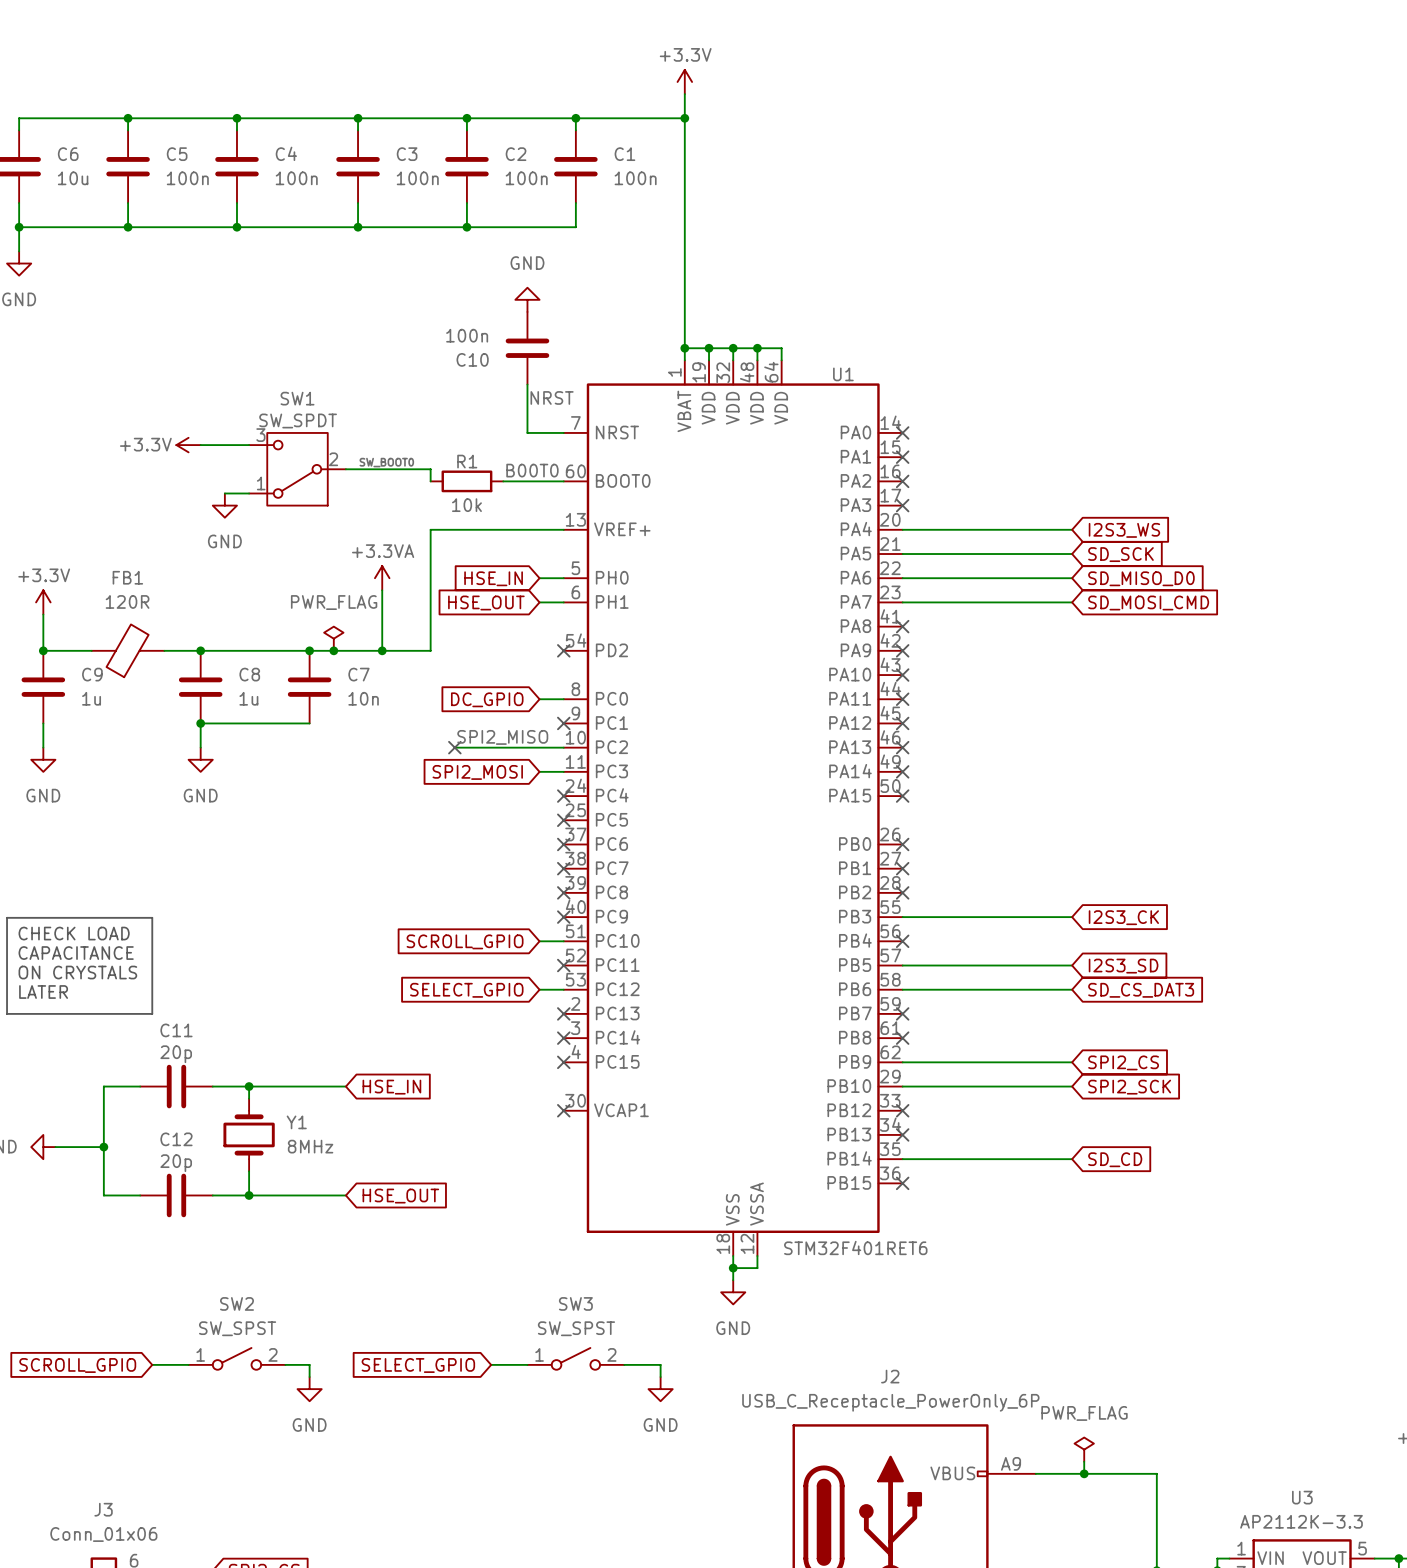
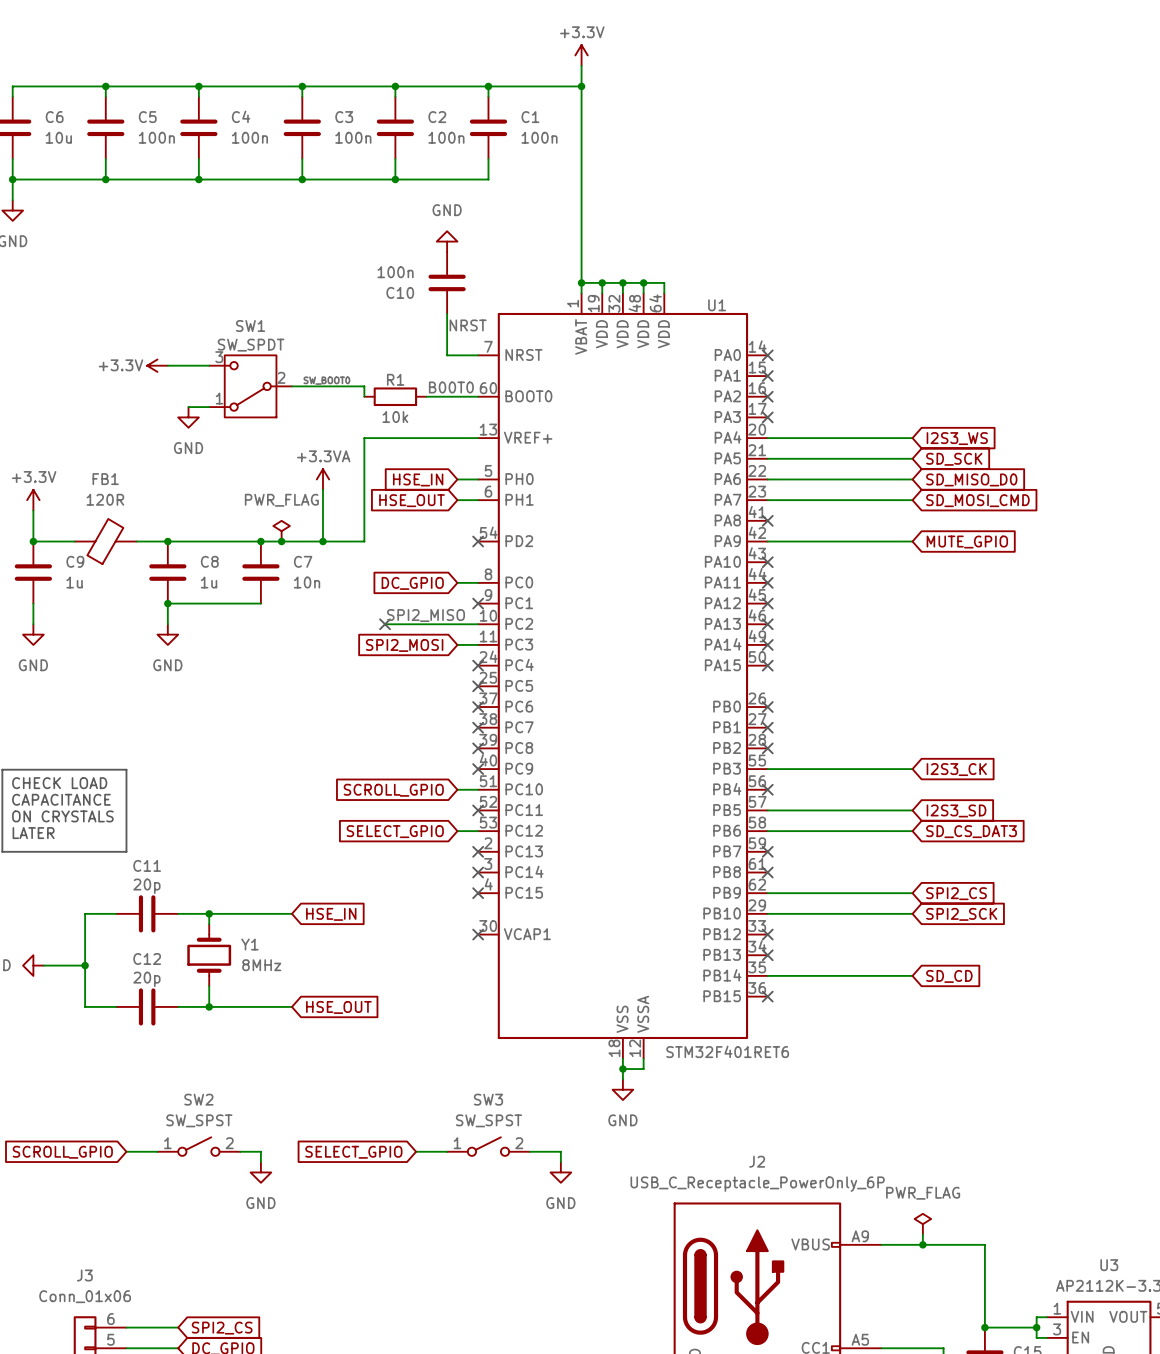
wire: none -> (767, 541) (912, 541)
no-connect mark: (902, 650) -> none
global label: none -> MUTE_GPIO (967, 542)

